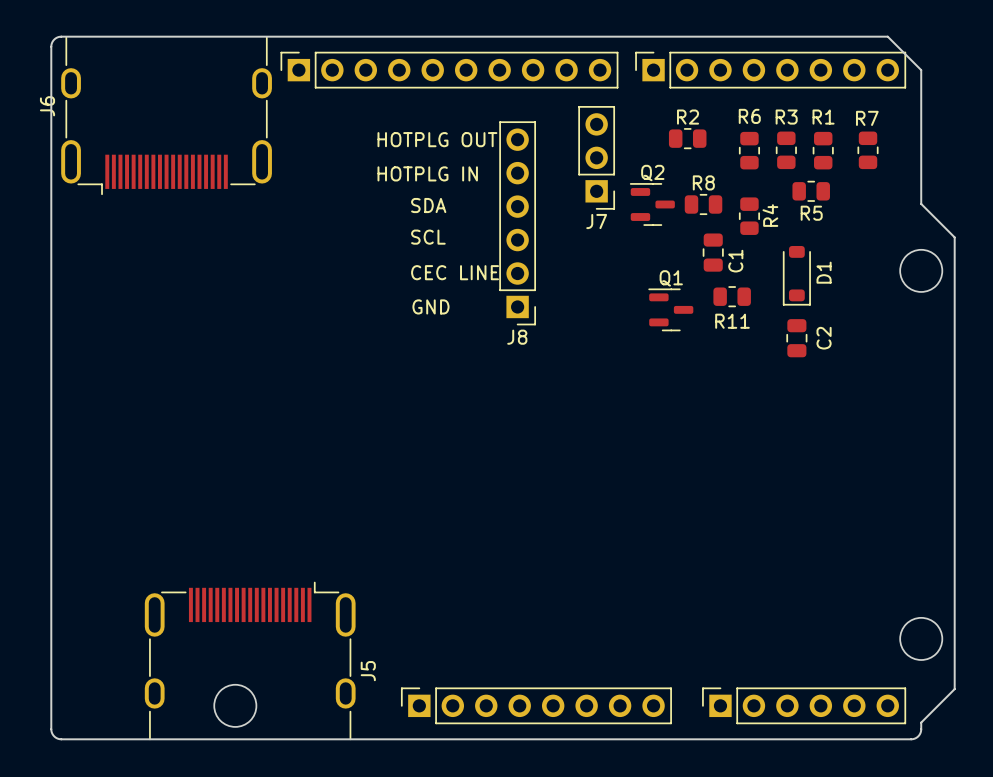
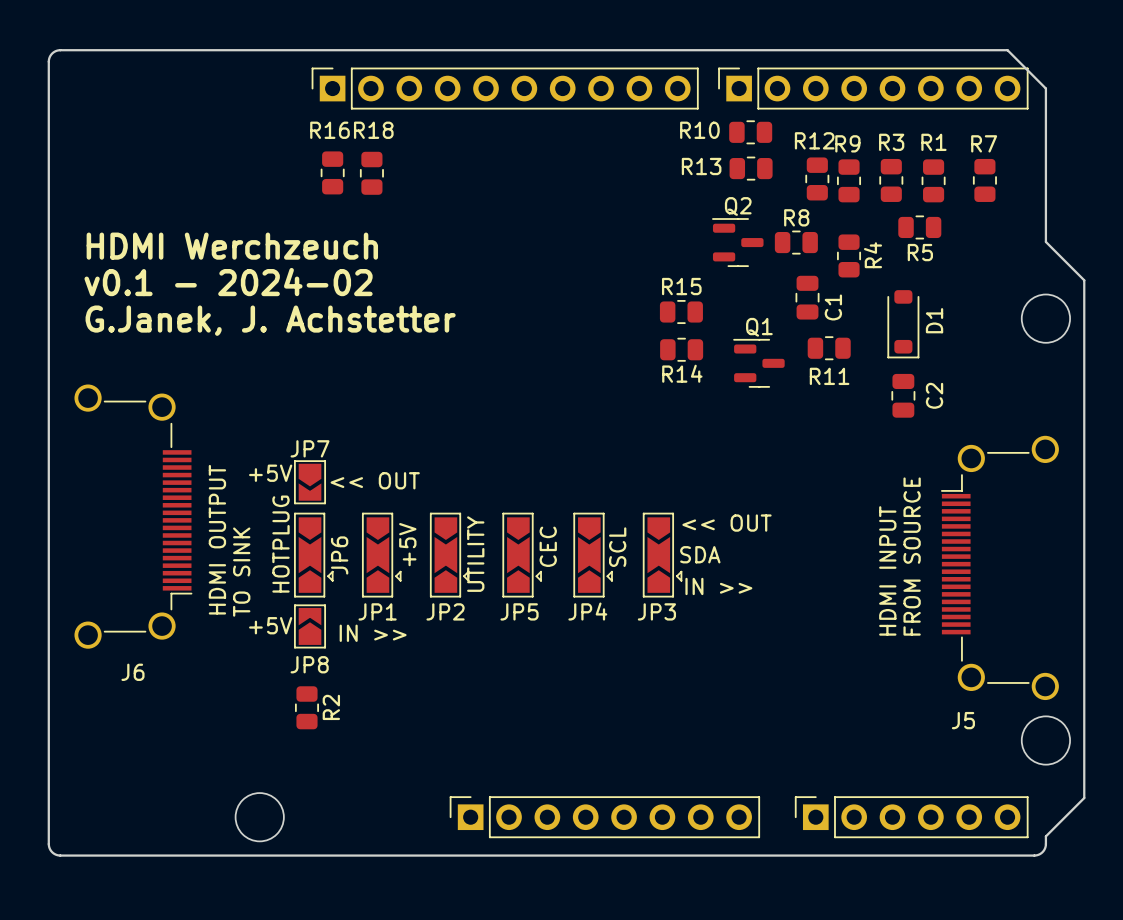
J6 footprint: [61, 36, 272, 196] -> [74, 384, 193, 649]
J6 name position: J6 (47, 106) -> J6 (133, 672)
R10: none -> (750, 132)
R6 name: R6 (749, 116) -> R9 (847, 143)
R2 rotation: 0° (687, 138) -> 90° clockwise (306, 707)
R2 position: (687, 138) -> (306, 707)
text: HOTPLG OUT (437, 139) -> none
R13: none -> (751, 168)
R16: none -> (332, 172)
R18: none -> (371, 173)
R12: none -> (817, 178)
J7: (596, 157) -> none
text: HOTPLG IN (427, 173) -> none
text: SDA (428, 205) -> none
text: none -> HDMI Werchzeuch (232, 246)
J8: (517, 223) -> none
text rotation: 0° (428, 237) -> 90° counterclockwise (617, 547)
text position: SCL (428, 237) -> SCL (617, 547)
text: none -> v0.1 - 2024-02 (228, 282)
R15: none -> (681, 312)
text: none -> G.Janek, J. Achstetter (270, 320)
text: CEC LINE (455, 272) -> none
R14: none -> (681, 349)
text: GND (430, 306) -> none
text: none -> +5V (270, 473)
text: none -> << OUT (375, 480)
JP7: none -> (310, 482)
text: none -> << OUT (727, 523)
text: none -> HDMI OUTPUT (217, 539)
text: none -> HOTPLUG (280, 544)
text: none -> +5V (407, 544)
text: none -> CEC (548, 546)
text: none -> UTILITY (475, 554)
text: none -> SDA (700, 554)
JP6: none -> (313, 555)
JP1: none -> (381, 555)
JP2: none -> (449, 555)
JP5: none -> (522, 555)
JP4: none -> (593, 555)
JP3: none -> (662, 555)
text: none -> FROM SOURCE (912, 556)
text: none -> HDMI INPUT (887, 570)
text: none -> TO SINK (241, 572)
text: none -> IN >> (718, 586)
text: none -> +5V (270, 625)
JP8: none -> (310, 626)
text: none -> IN >> (373, 633)
J5 footprint: [144, 581, 356, 741] -> [940, 435, 1059, 701]
J5 name position: J5 (368, 671) -> J5 (963, 720)

